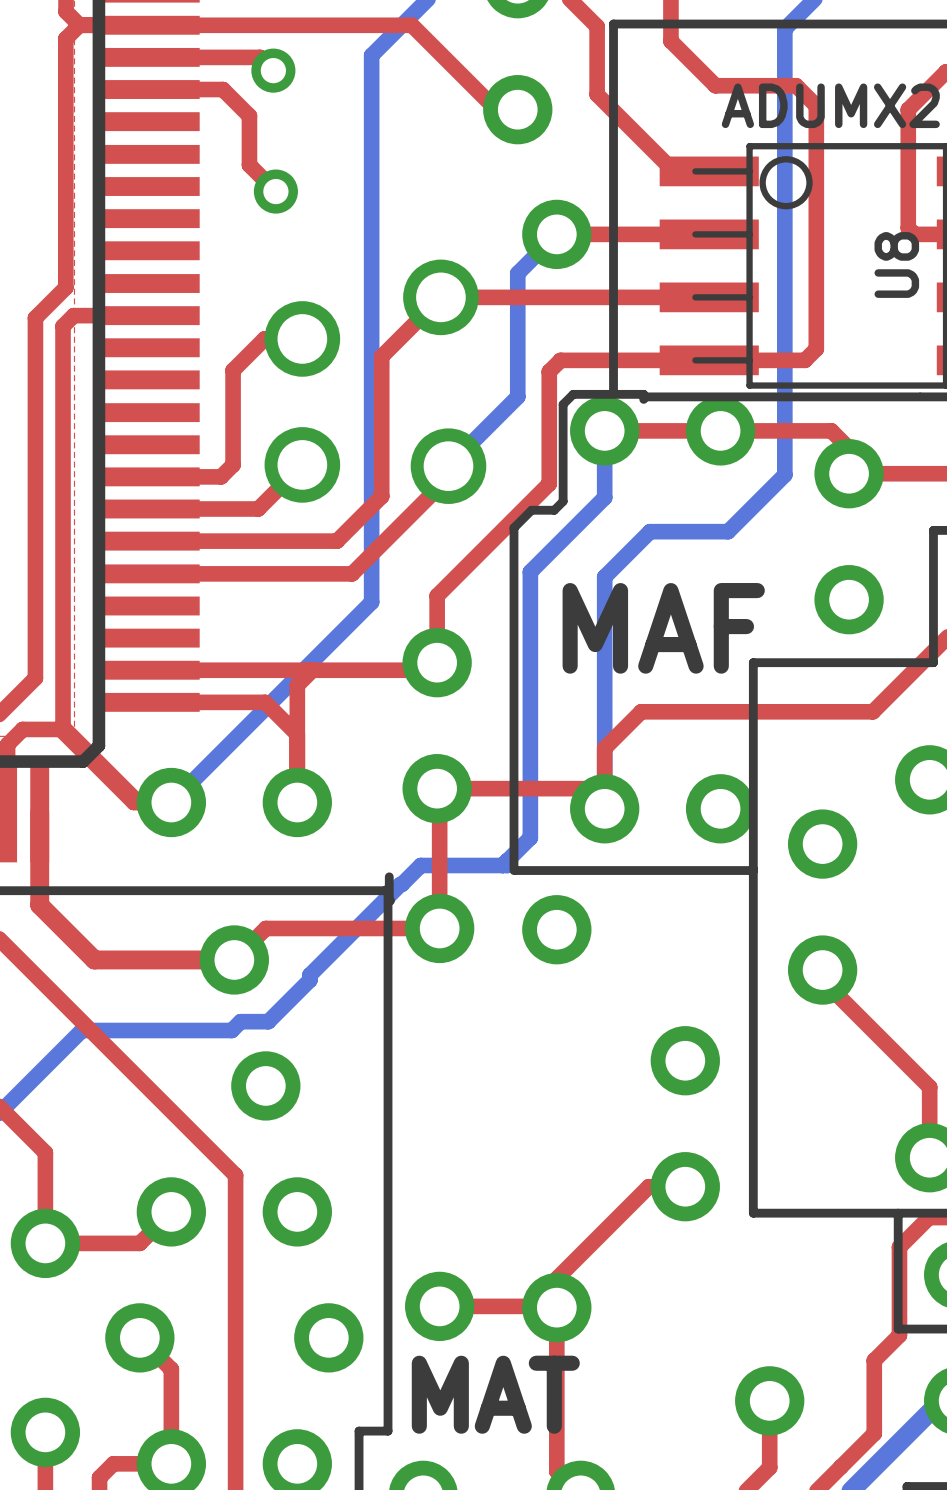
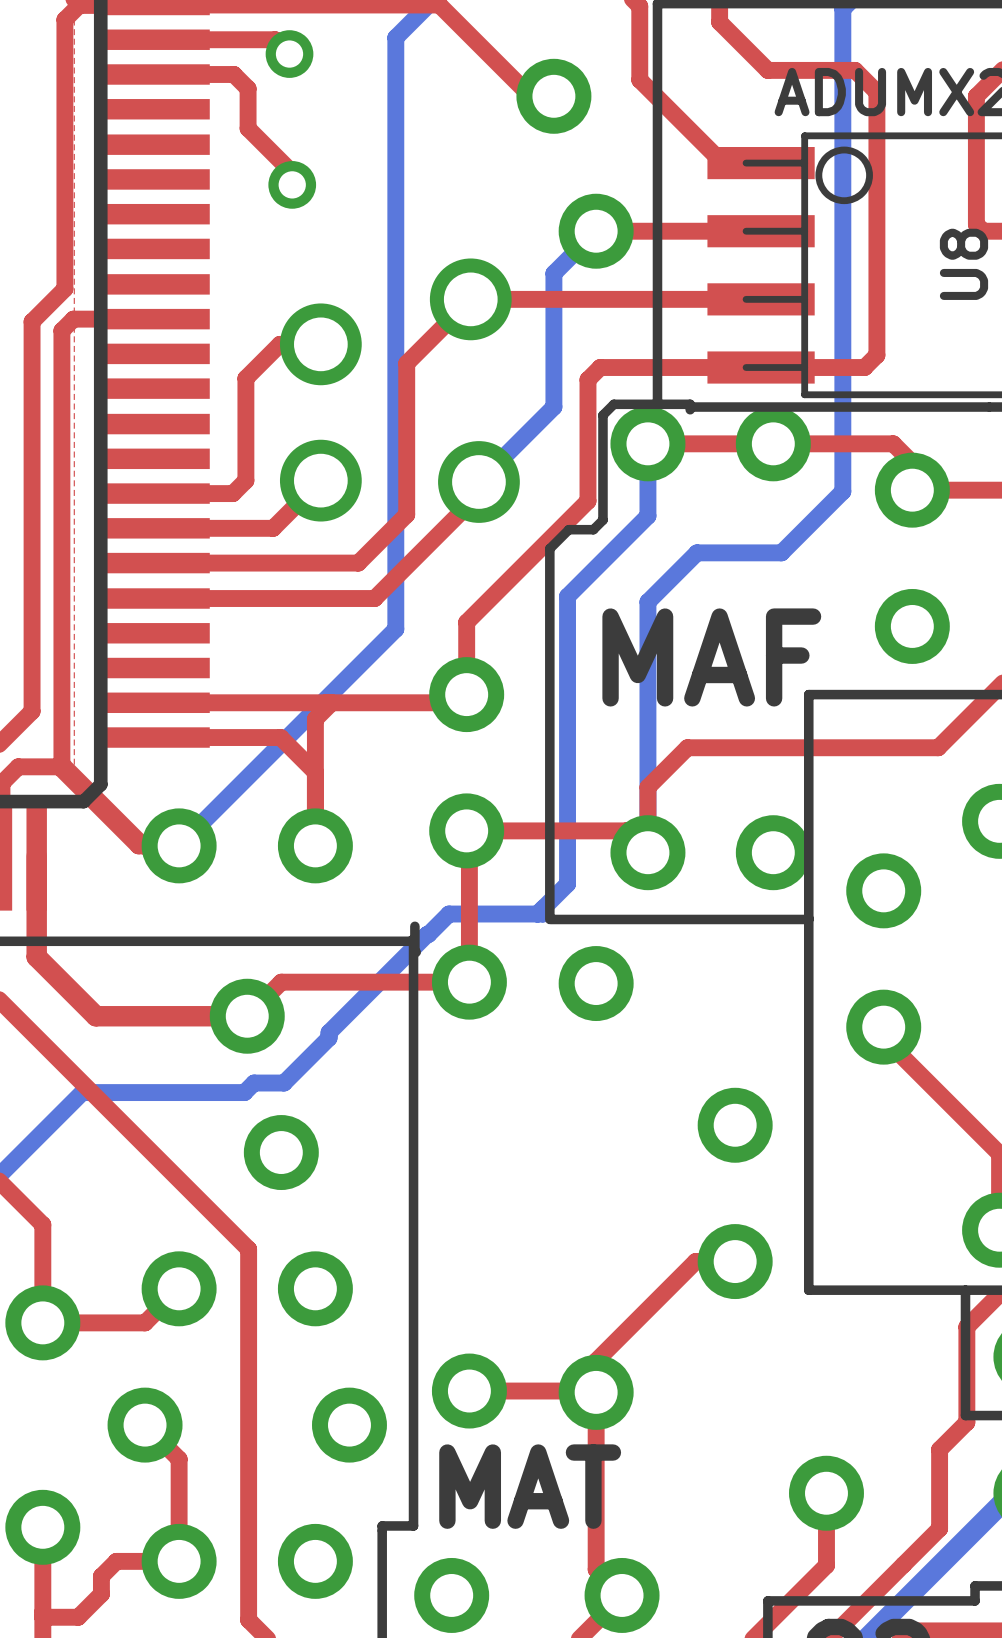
top track: (221, 89) (249, 115) (249, 165) (275, 191) -> (233, 74) (248, 88) (248, 128) (292, 172)

